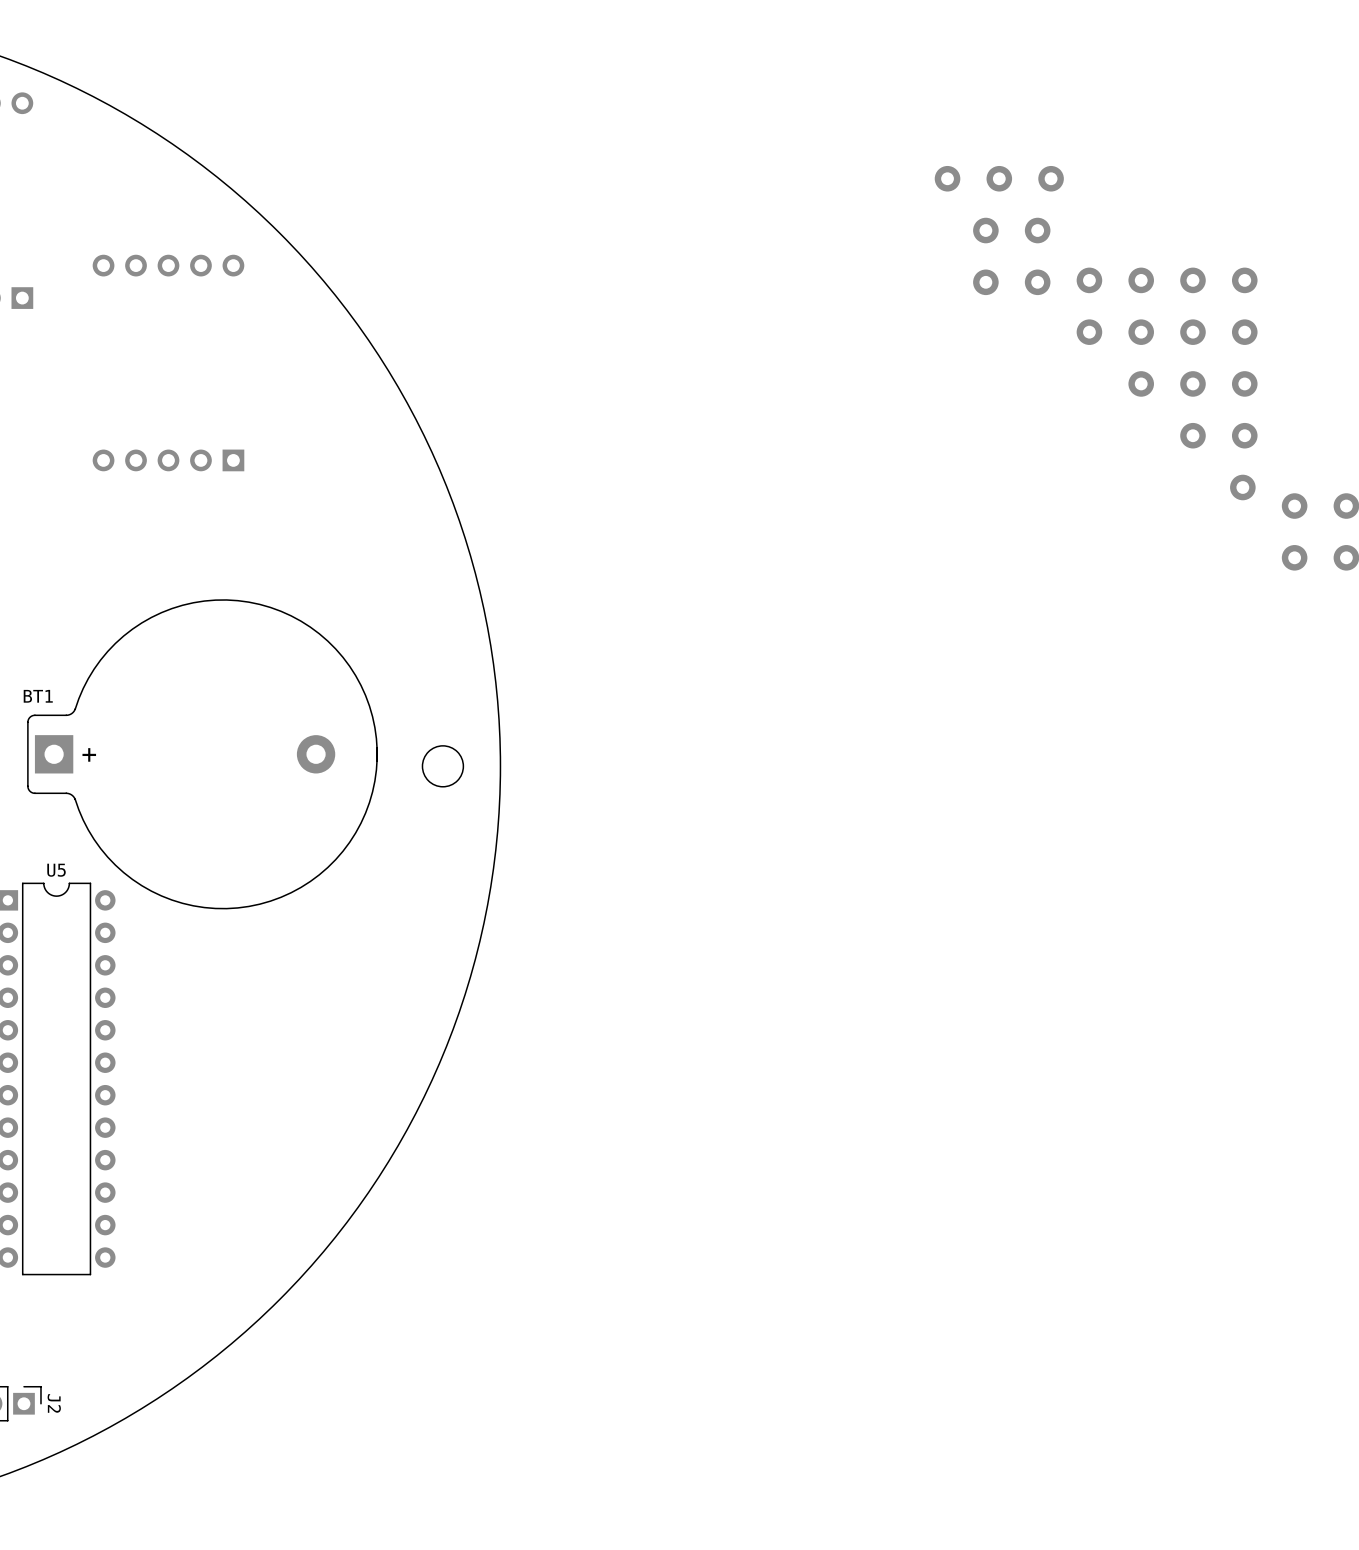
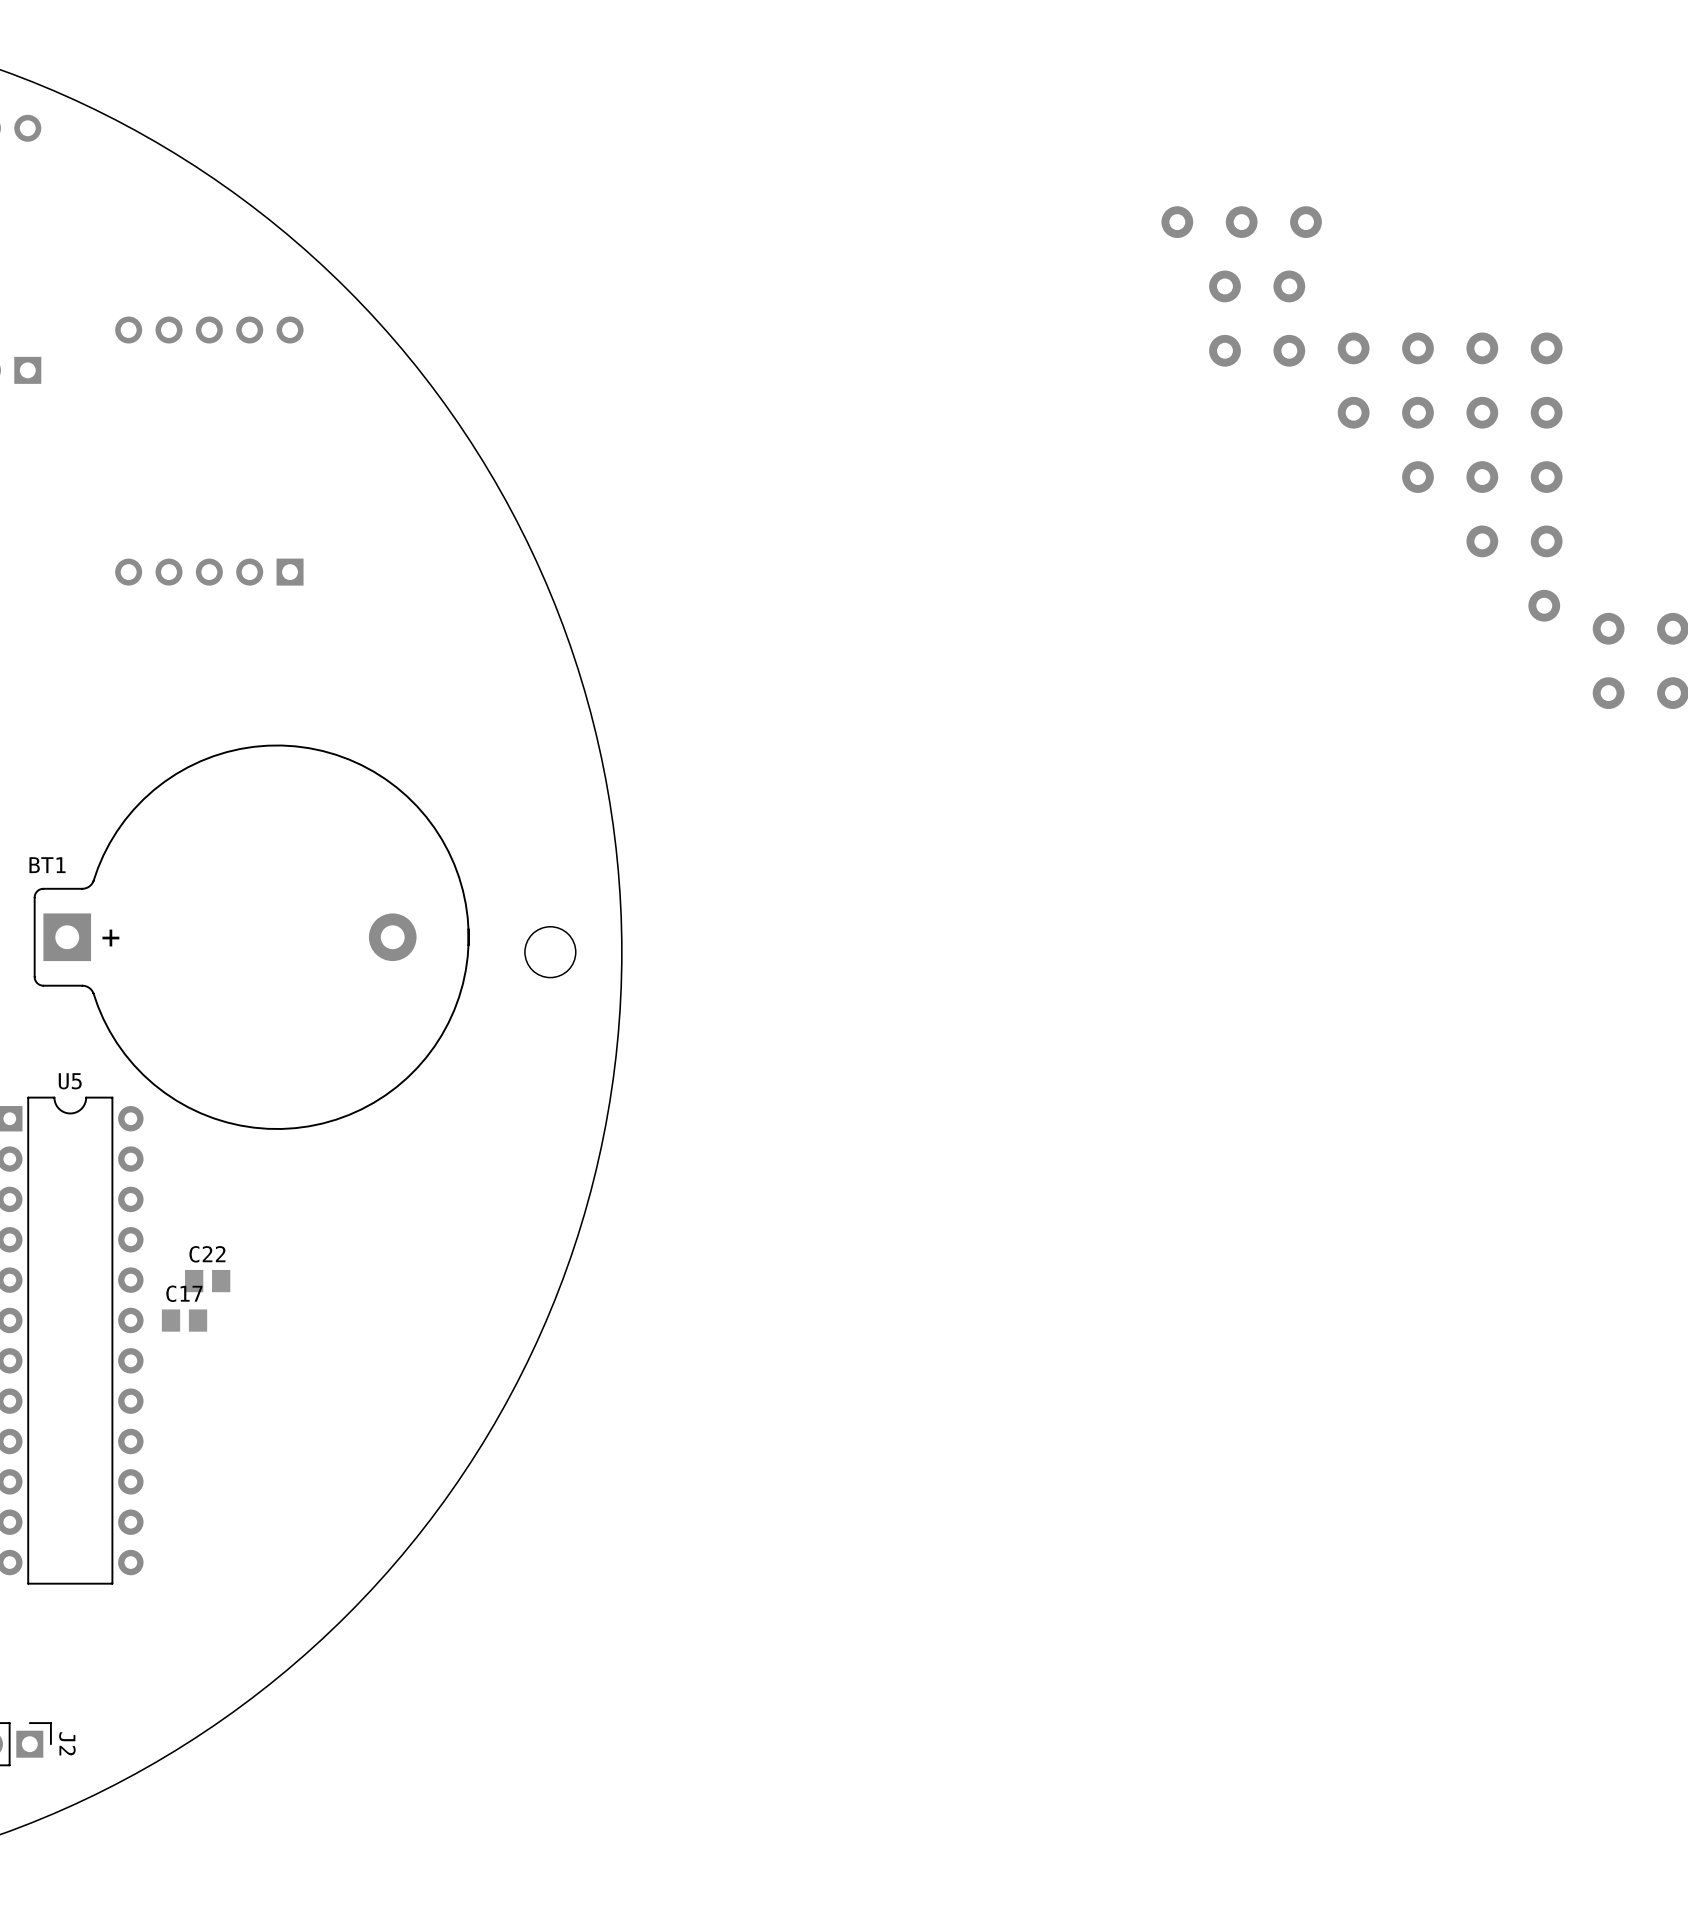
C22: none -> (207, 1281)
C17: none -> (184, 1320)

